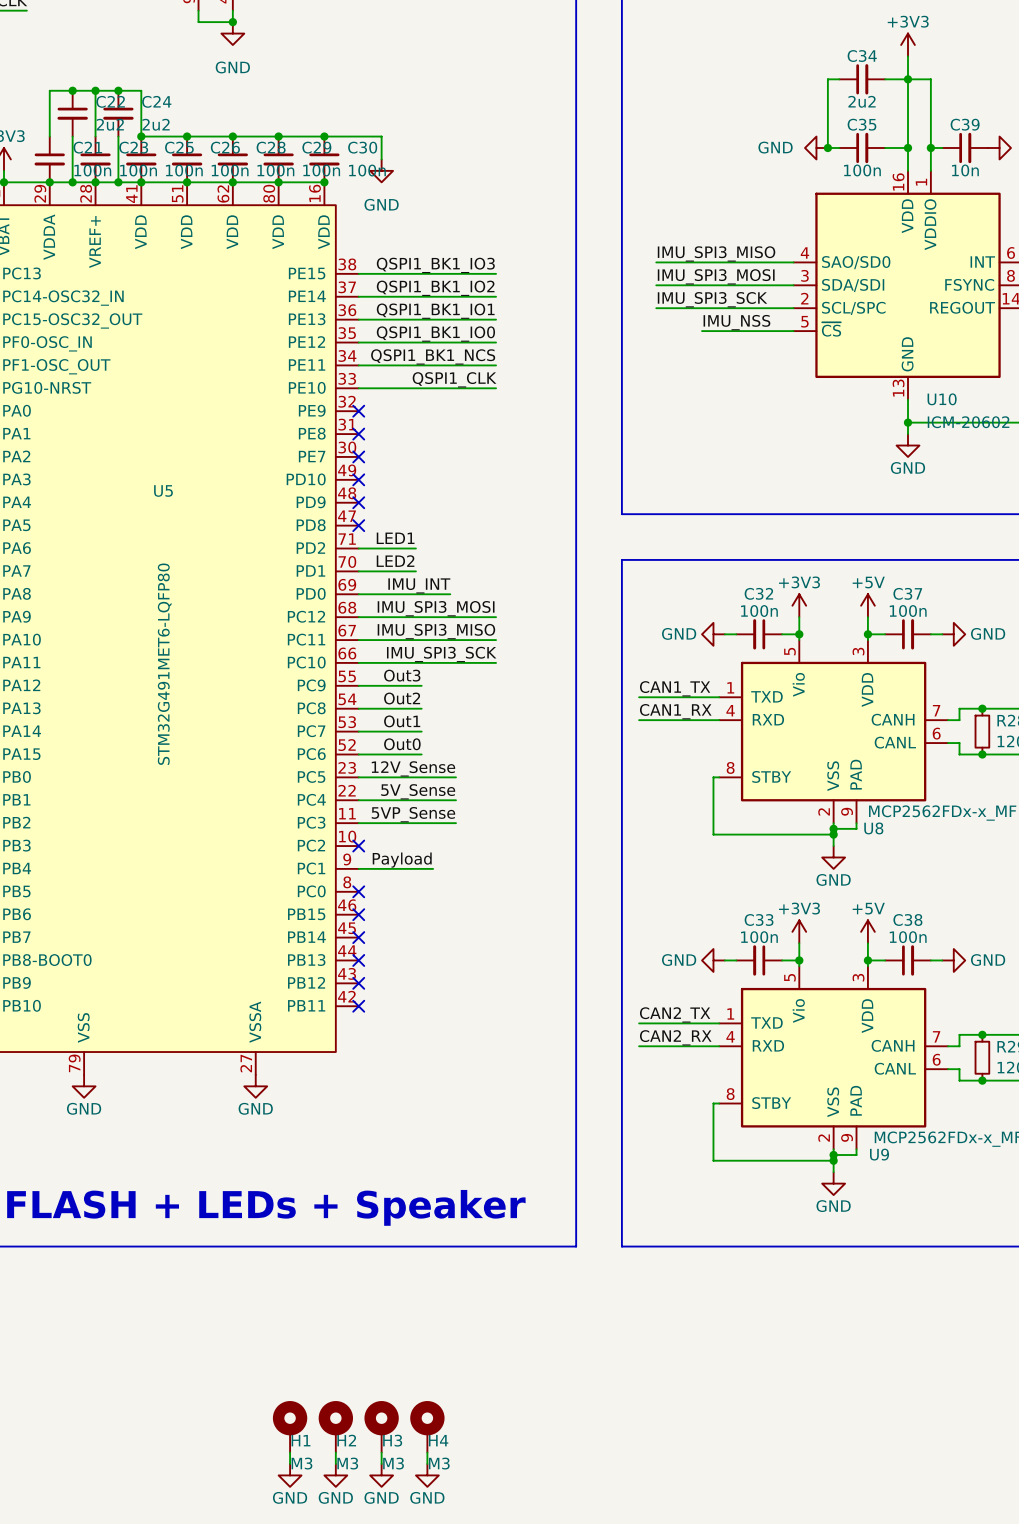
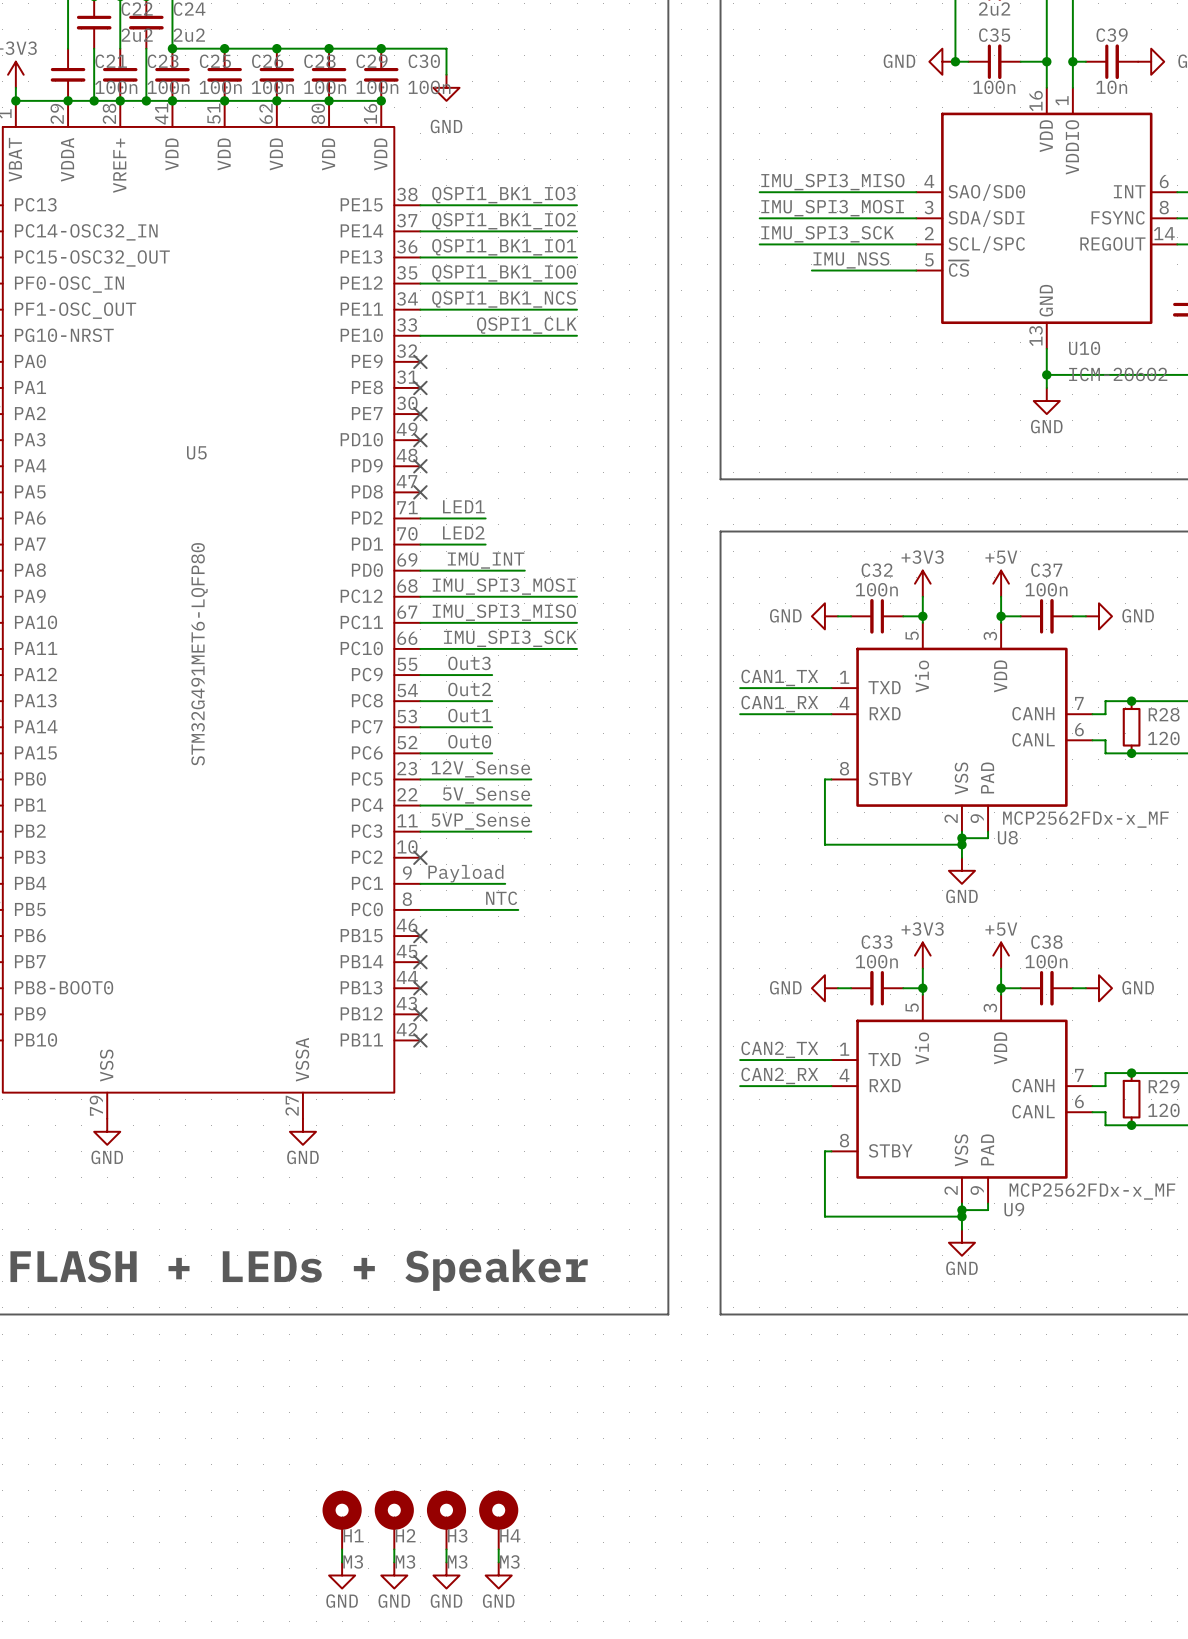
label: none -> NTC (501, 898)
wire: none -> (420, 909) (518, 909)
no-connect mark: (358, 891) -> none

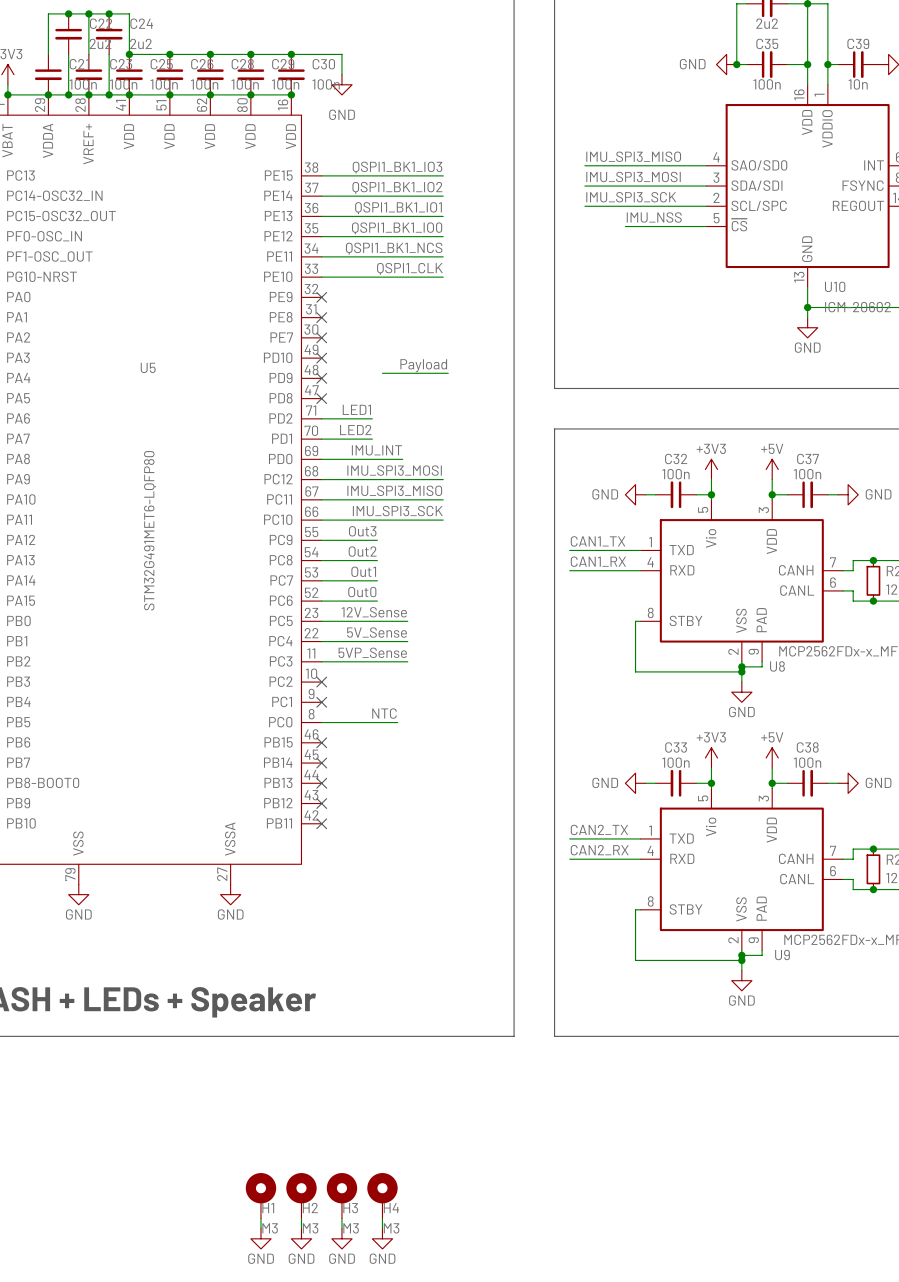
label: none -> Payload (423, 365)
wire: none -> (382, 373) (448, 373)
label: Payload (465, 873) -> none
wire: (420, 883) (505, 883) -> none
no-connect mark: none -> (321, 702)

